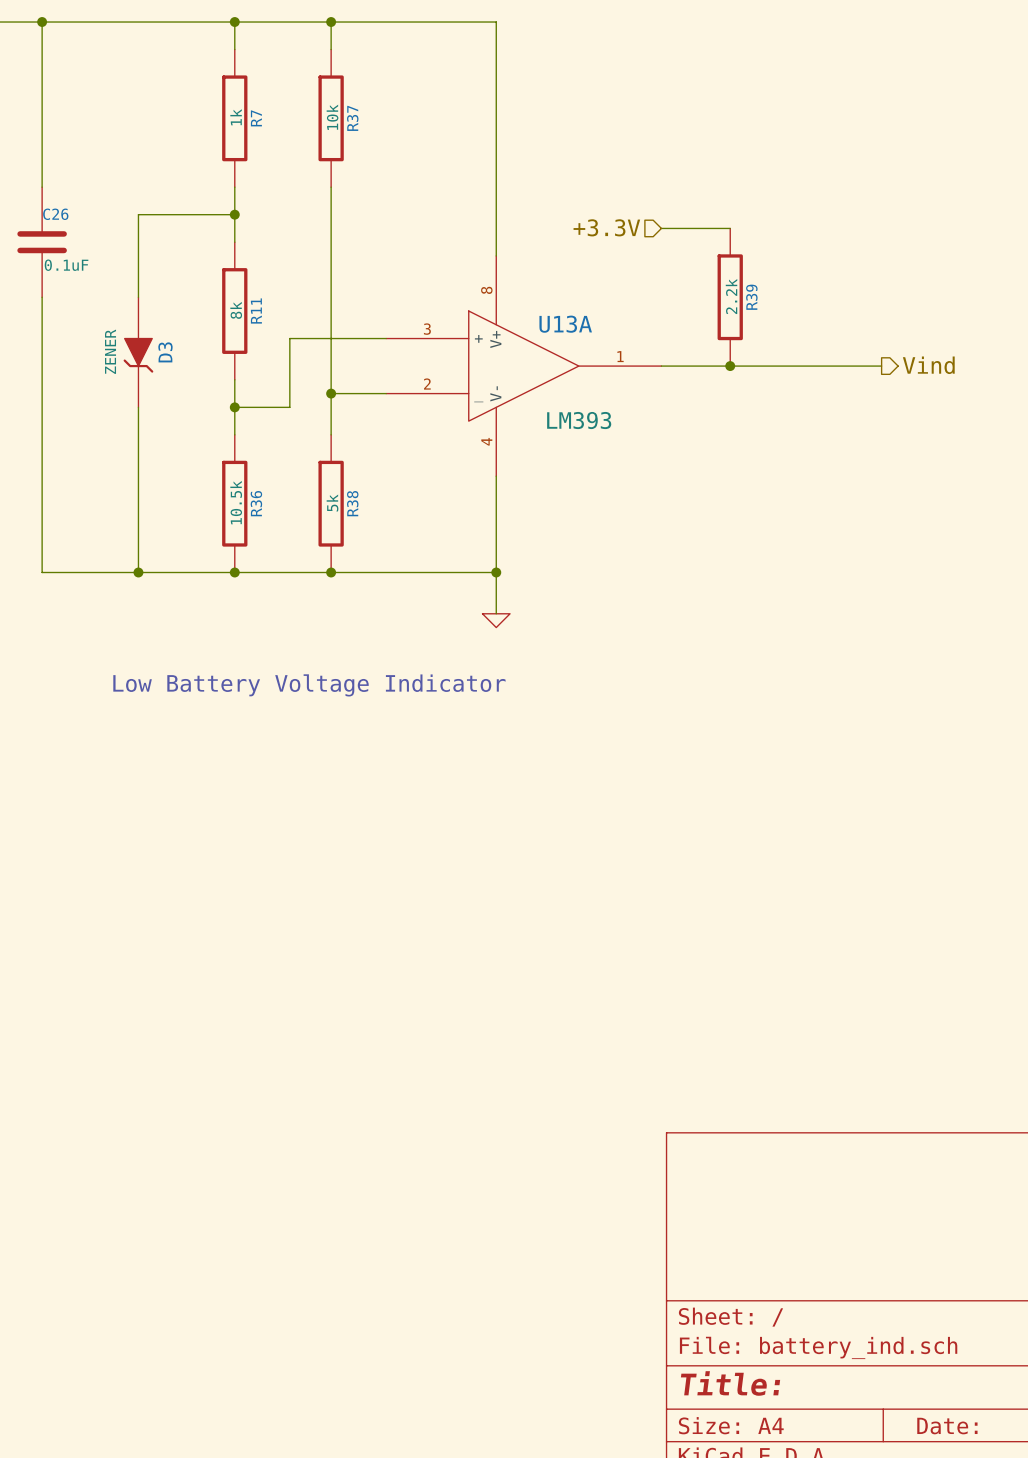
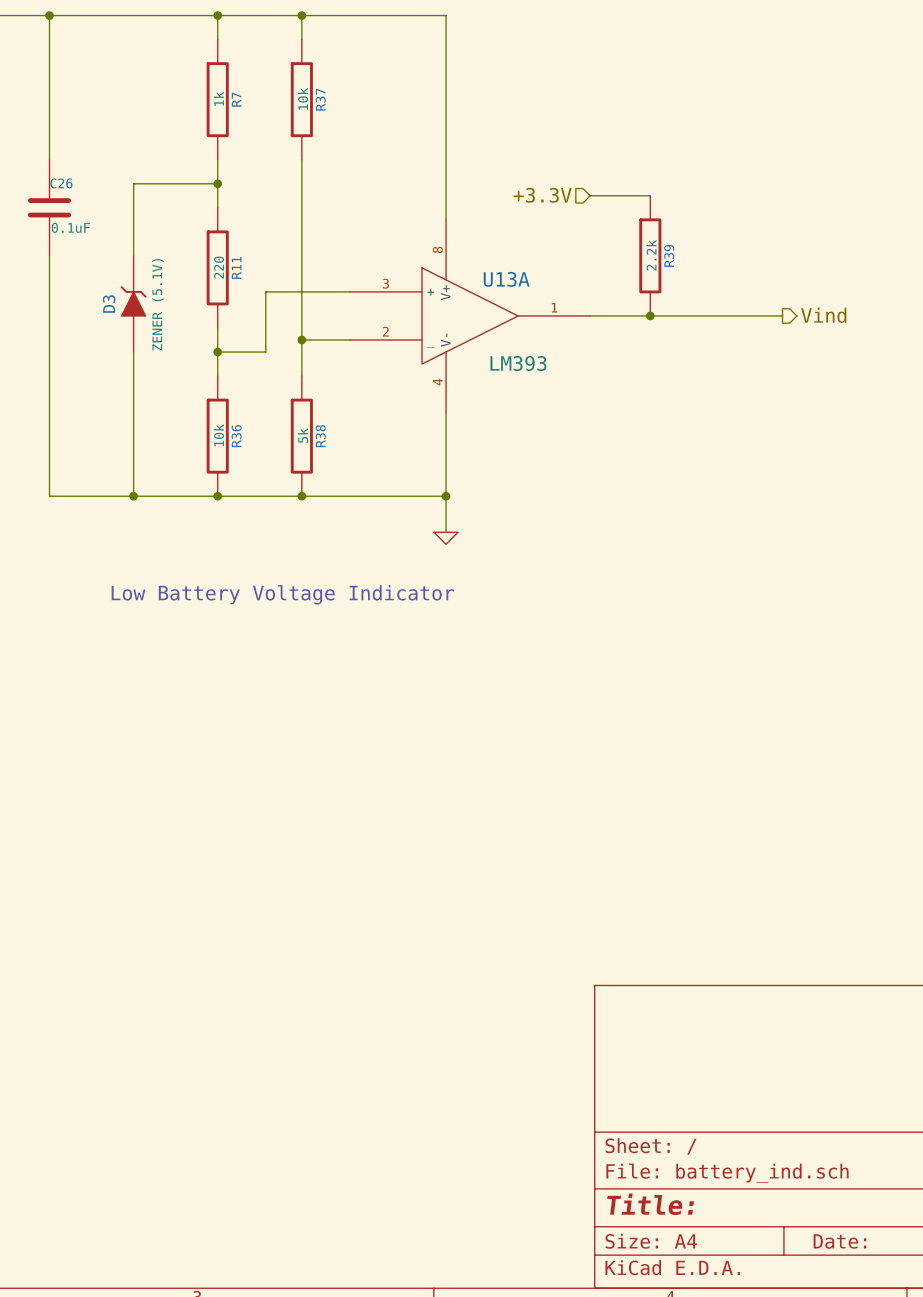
R11 value: 8k (236, 310) -> 220 (219, 267)
D3 value: ZENER (110, 351) -> ZENER (5.1V) (157, 304)
D3 rotation: 0° (138, 355) -> 180° (133, 301)
R36 value: 10.5k (236, 502) -> 10k (218, 435)

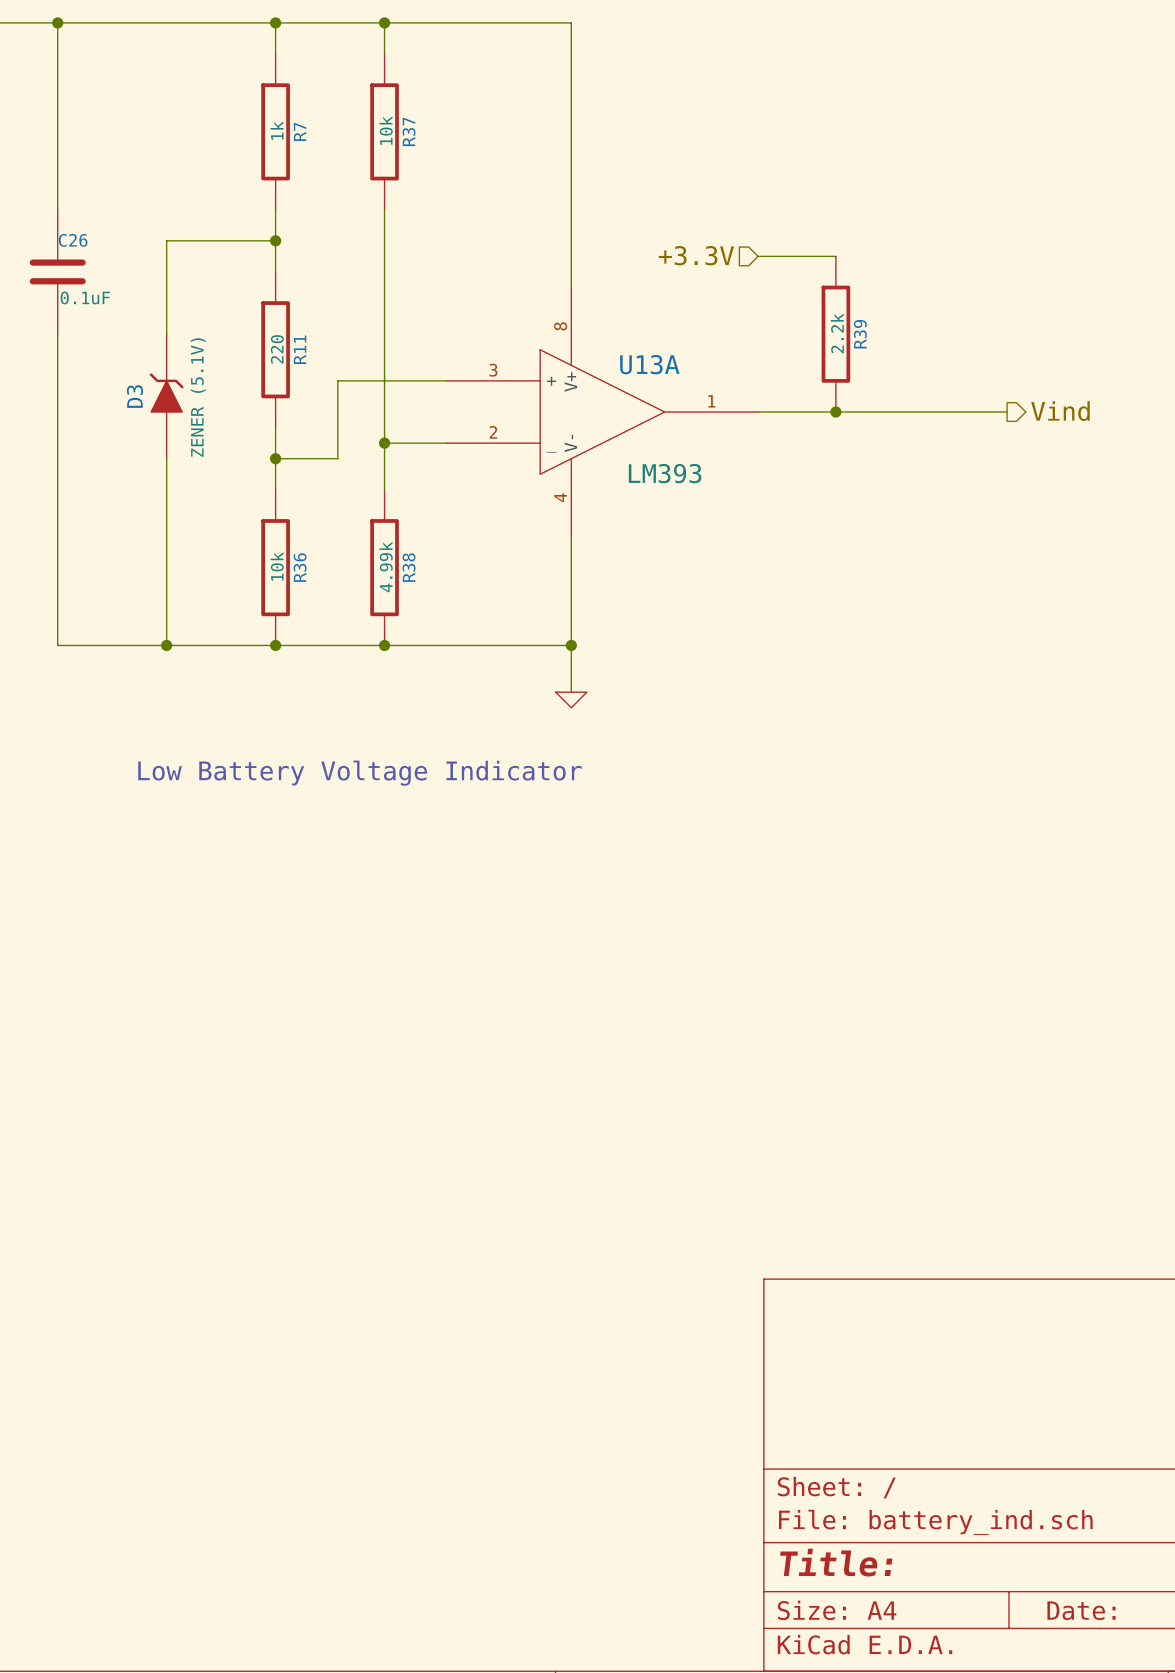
R38 value: 5k (303, 435) -> 4.99k (386, 567)

